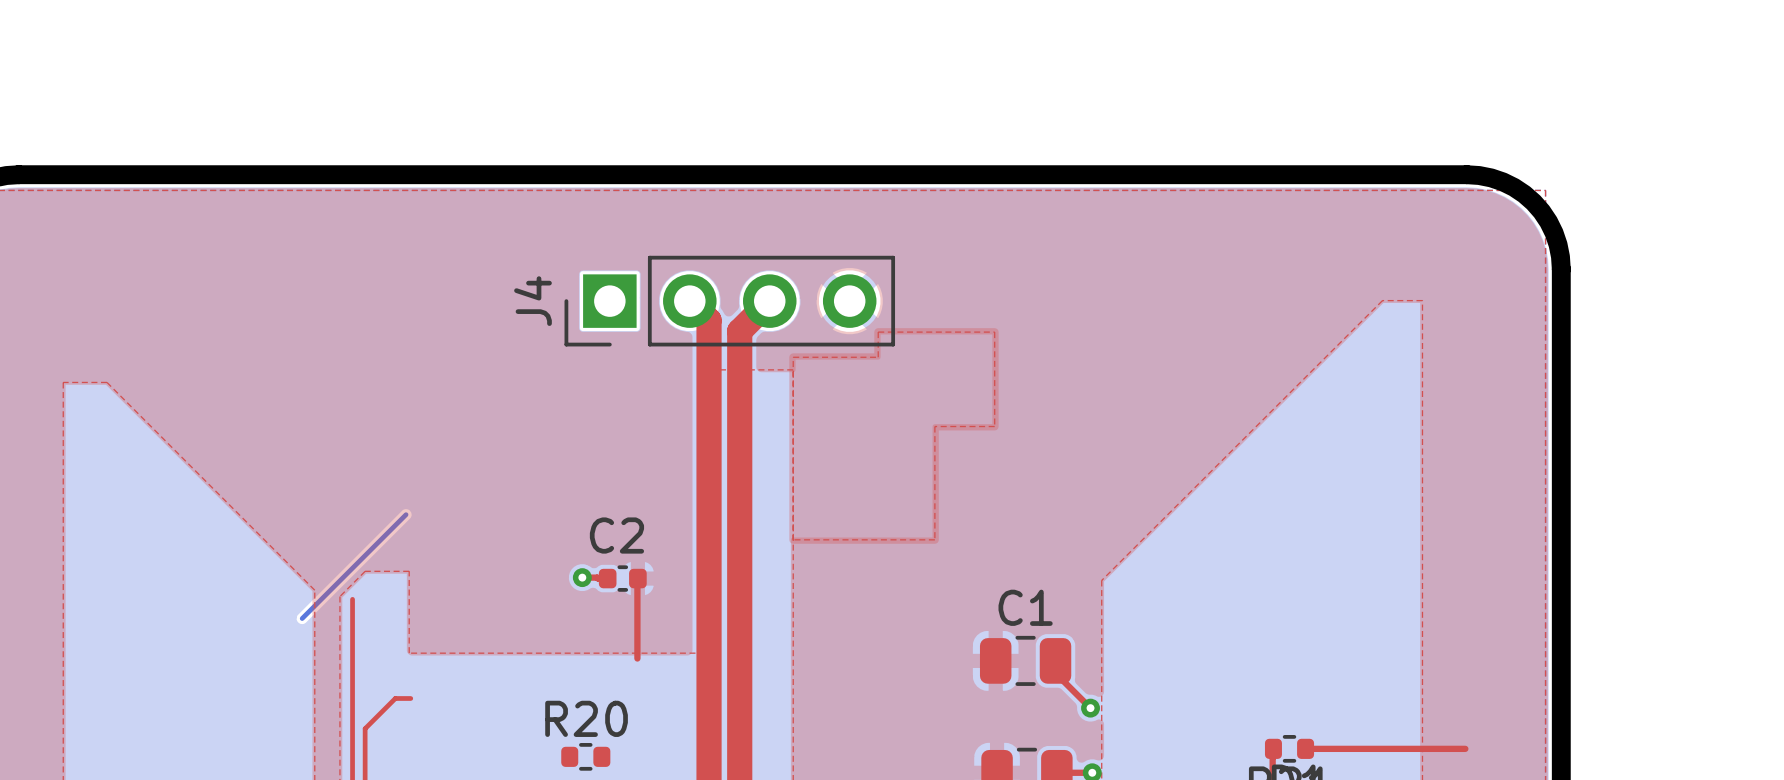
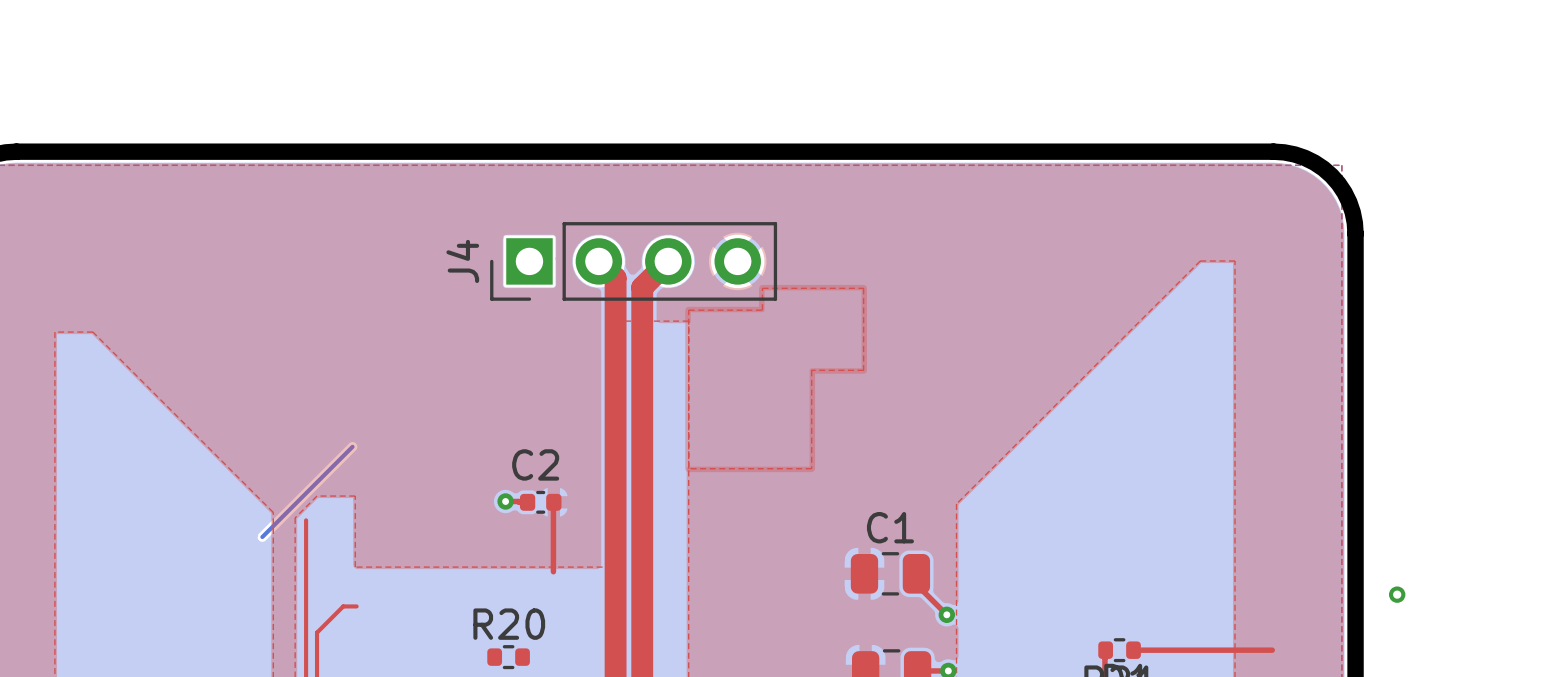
via: none -> (1397, 594)

